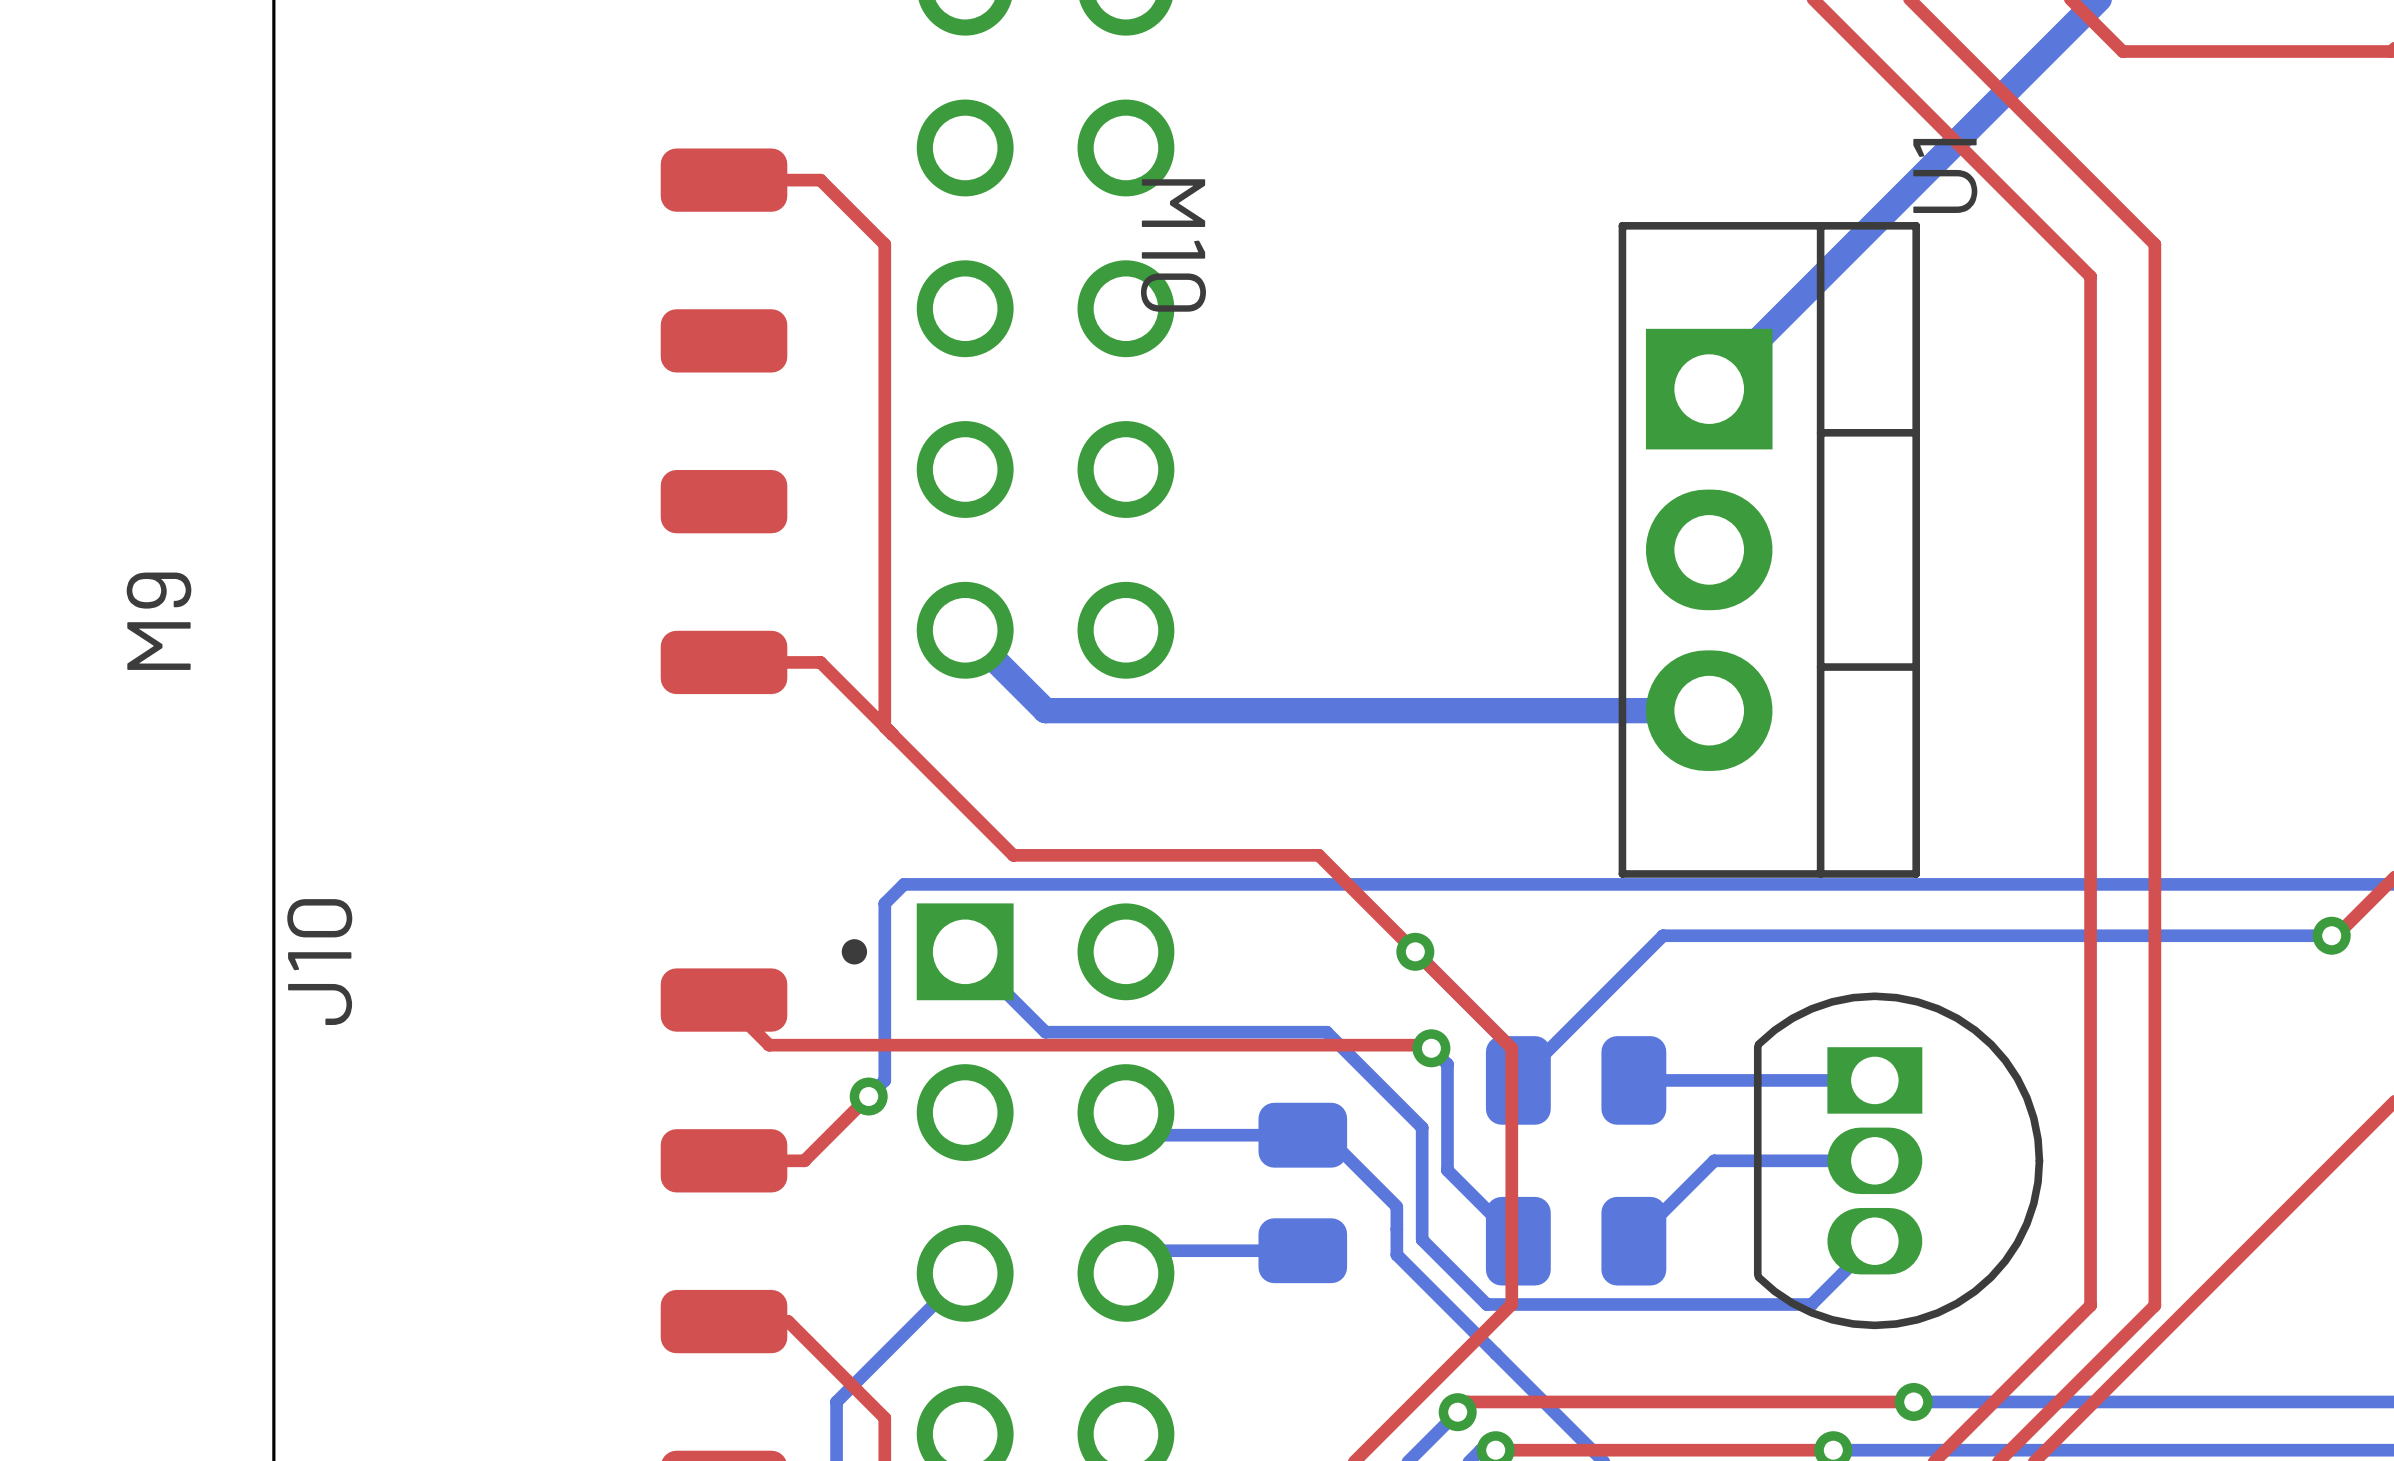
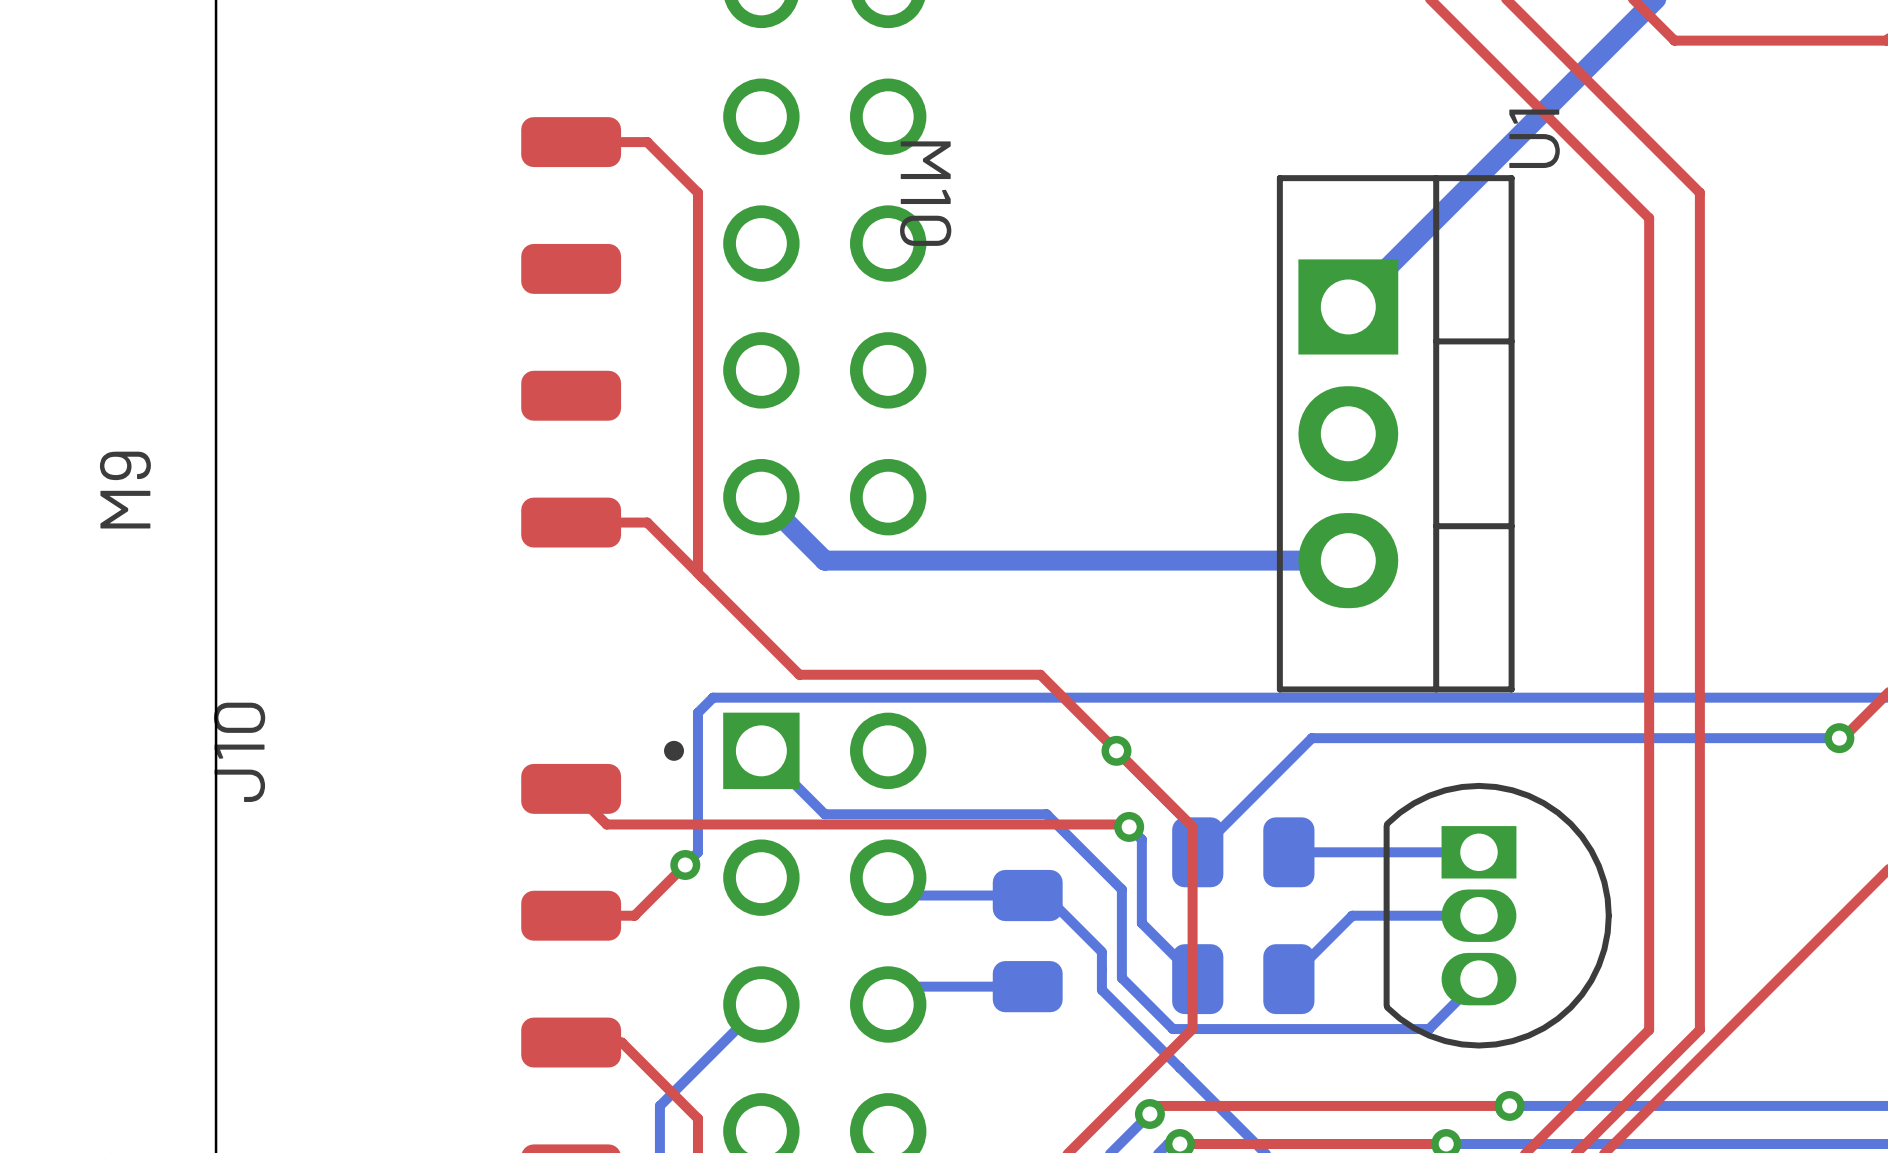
J10 name position: J10 (319, 962) -> J10 (239, 752)

